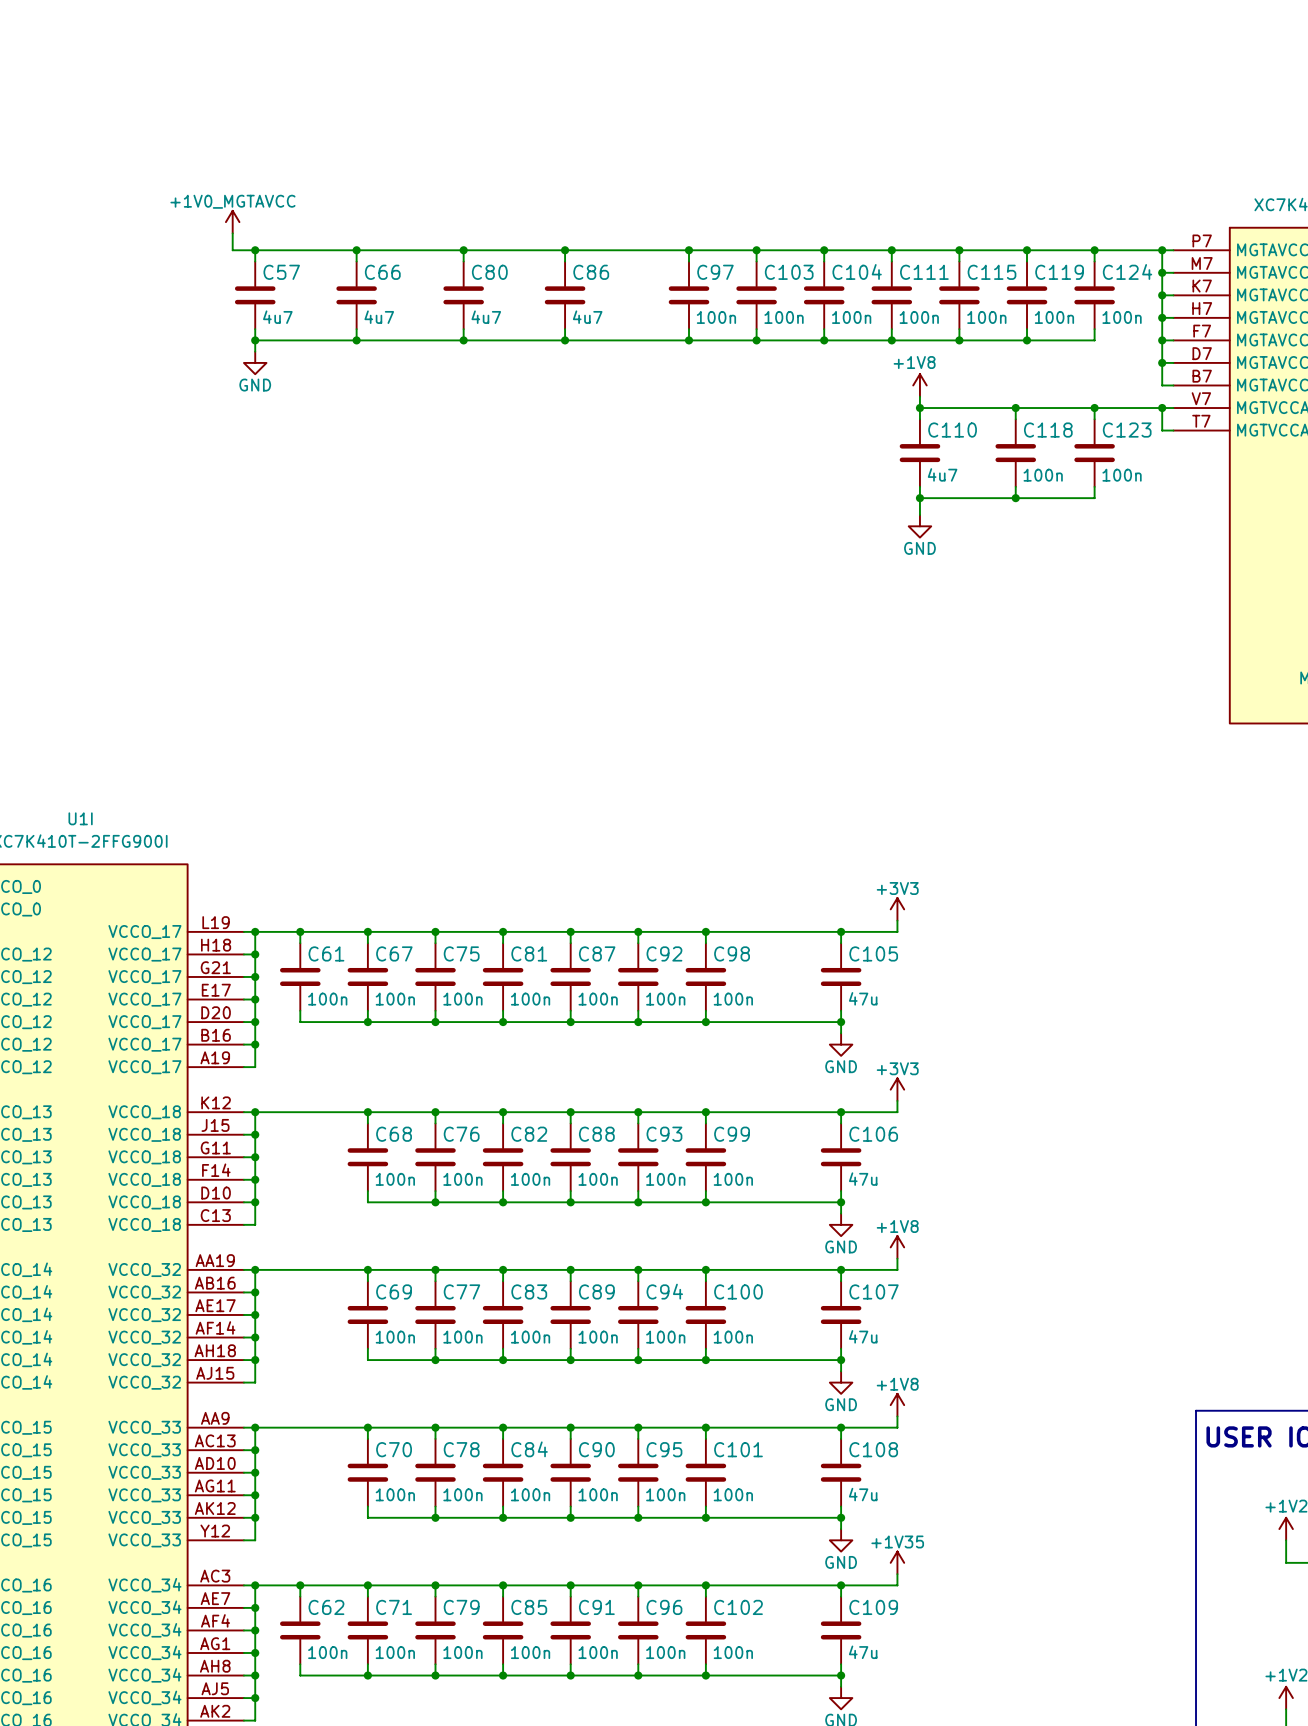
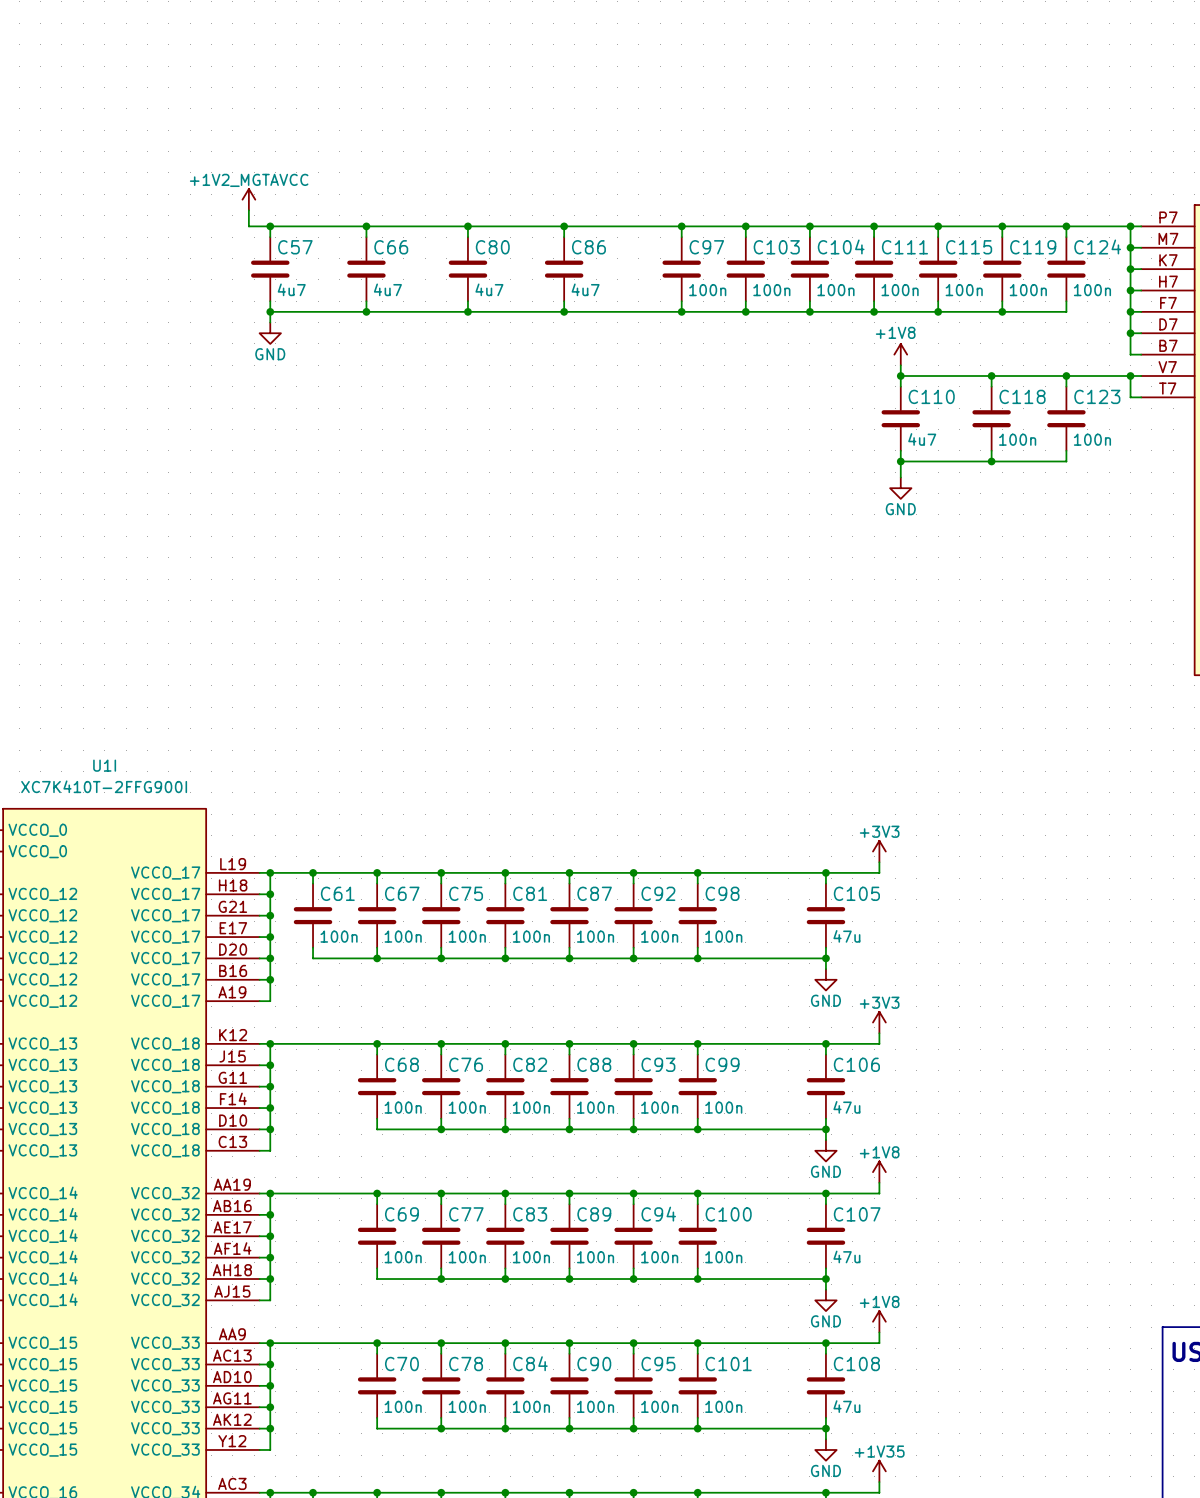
power symbol: +1V0_MGTAVCC (232, 222) -> +1V2_MGTAVCC (248, 199)

